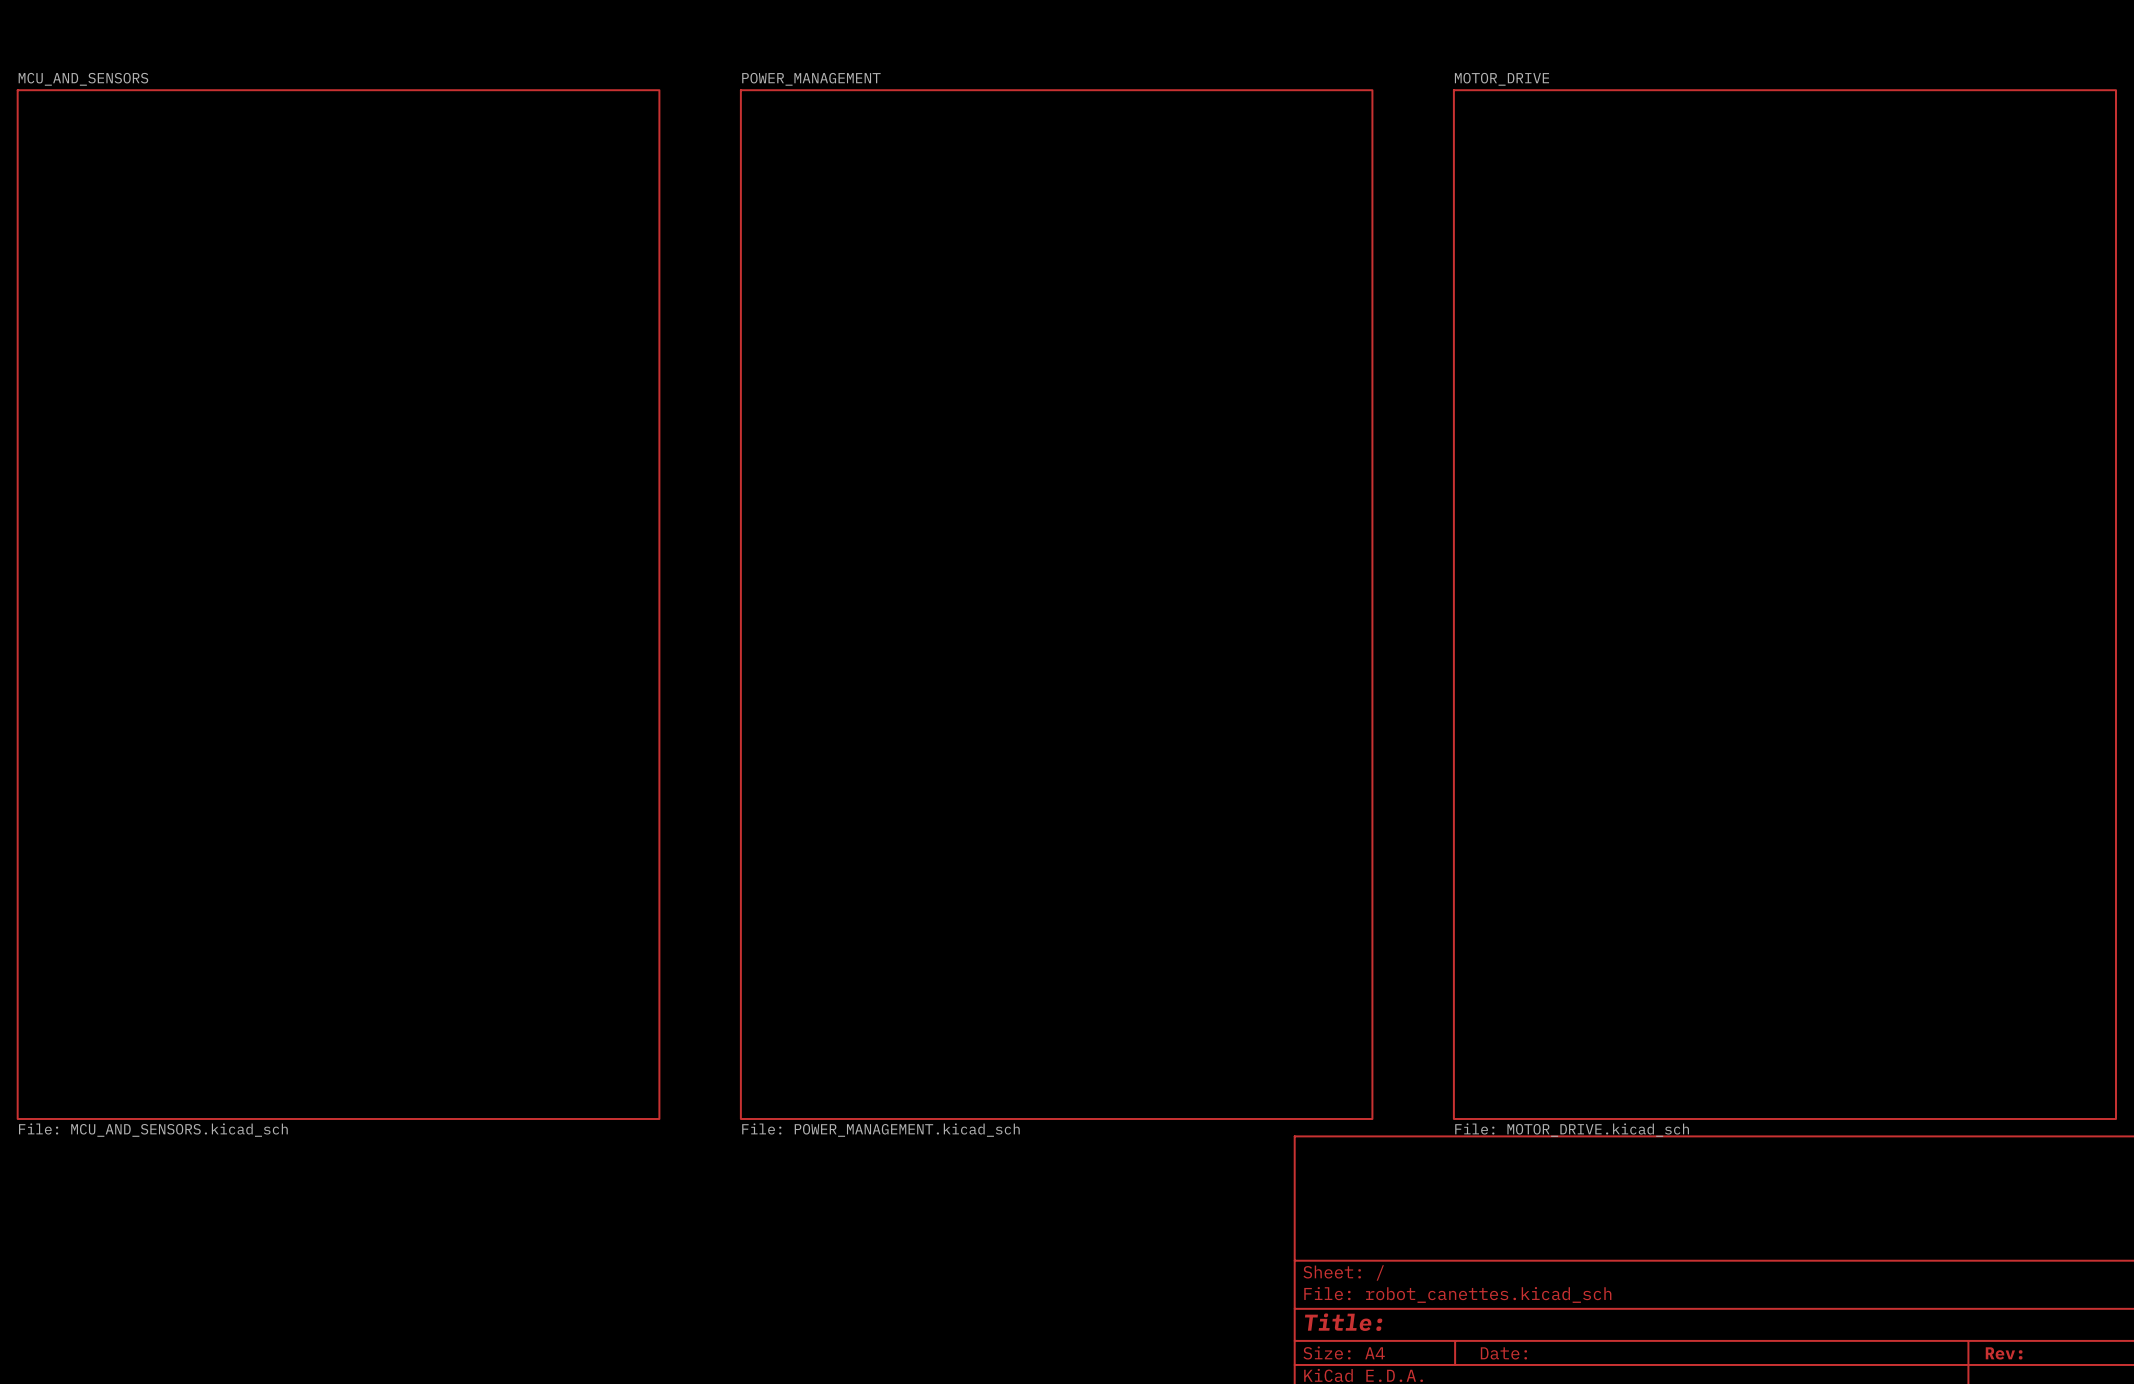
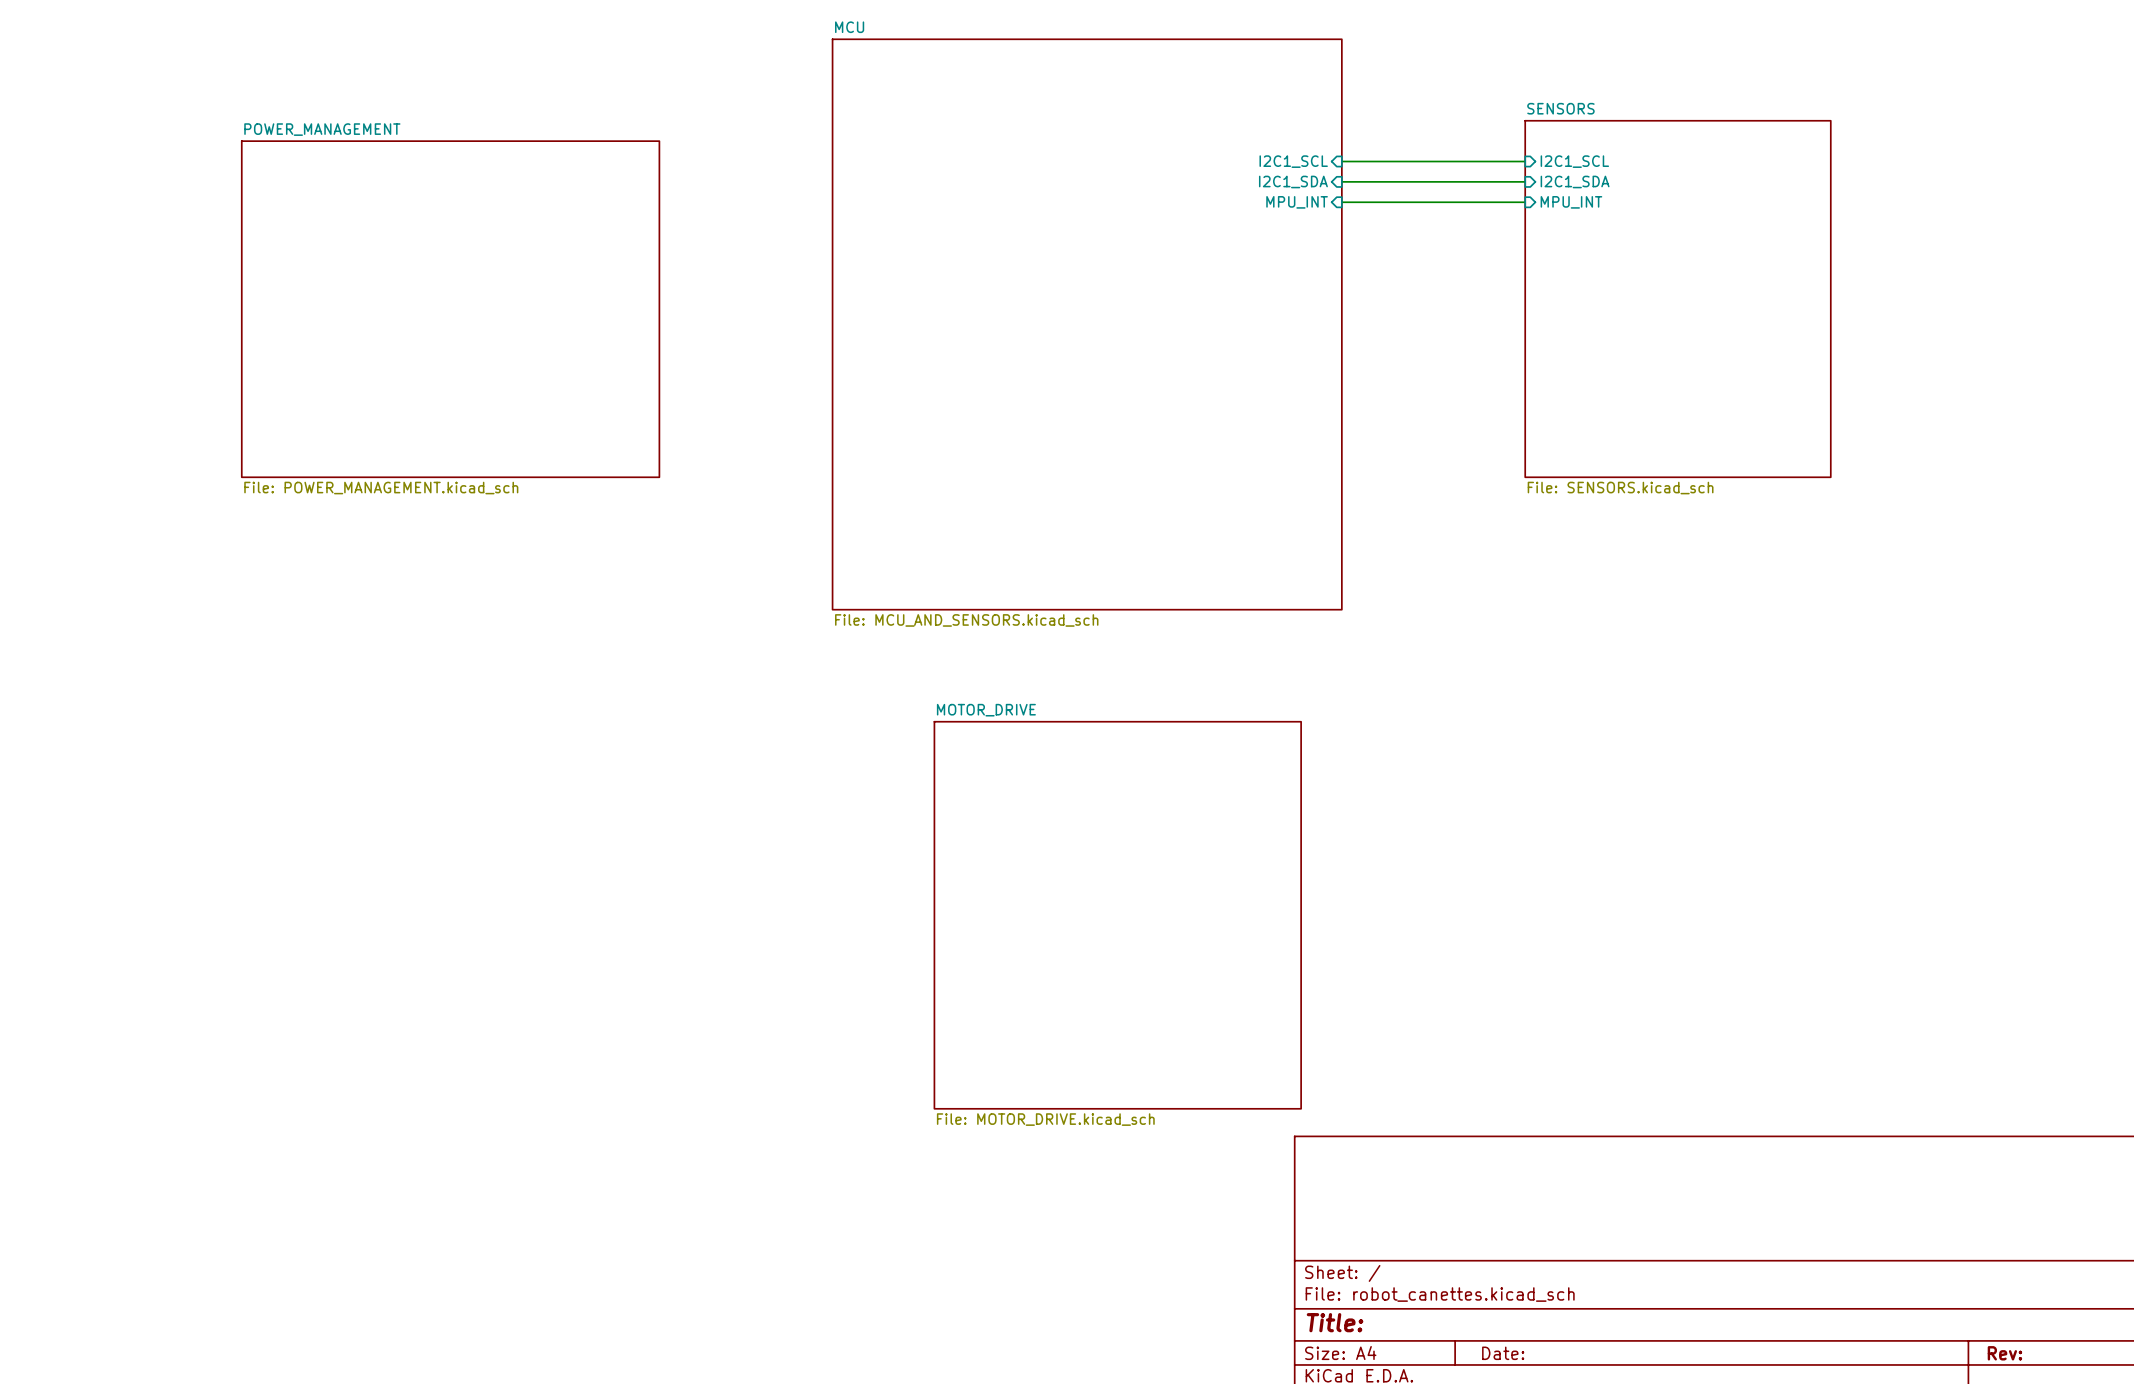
wire: none -> (1341, 161) (1525, 161)
sheet pin: none -> I2C1_SCL (1293, 161)
sheet pin: none -> I2C1_SCL (1574, 161)
wire: none -> (1341, 181) (1525, 181)
sheet pin: none -> I2C1_SDA (1293, 181)
sheet pin: none -> I2C1_SDA (1575, 181)
wire: none -> (1341, 202) (1525, 202)
sheet pin: none -> MPU_INT (1297, 202)
sheet pin: none -> MPU_INT (1571, 202)
sheet SENSORS: none -> File: SENSORS.kicad_sch (1677, 299)
sheet POWER_MANAGEMENT: none -> File: POWER_MANAGEMENT.kicad_sch (450, 309)
sheet MCU: none -> File: MCU_AND_SENSORS.kicad_sch (1087, 324)
sheet MCU_AND_SENSORS: File: MCU_AND_SENSORS.kicad_sch (338, 604) -> none
sheet POWER_MANAGEMENT: File: POWER_MANAGEMENT.kicad_sch (1056, 604) -> none
sheet MOTOR_DRIVE: File: MOTOR_DRIVE.kicad_sch (1784, 604) -> none
sheet MOTOR_DRIVE: none -> File: MOTOR_DRIVE.kicad_sch (1117, 915)

